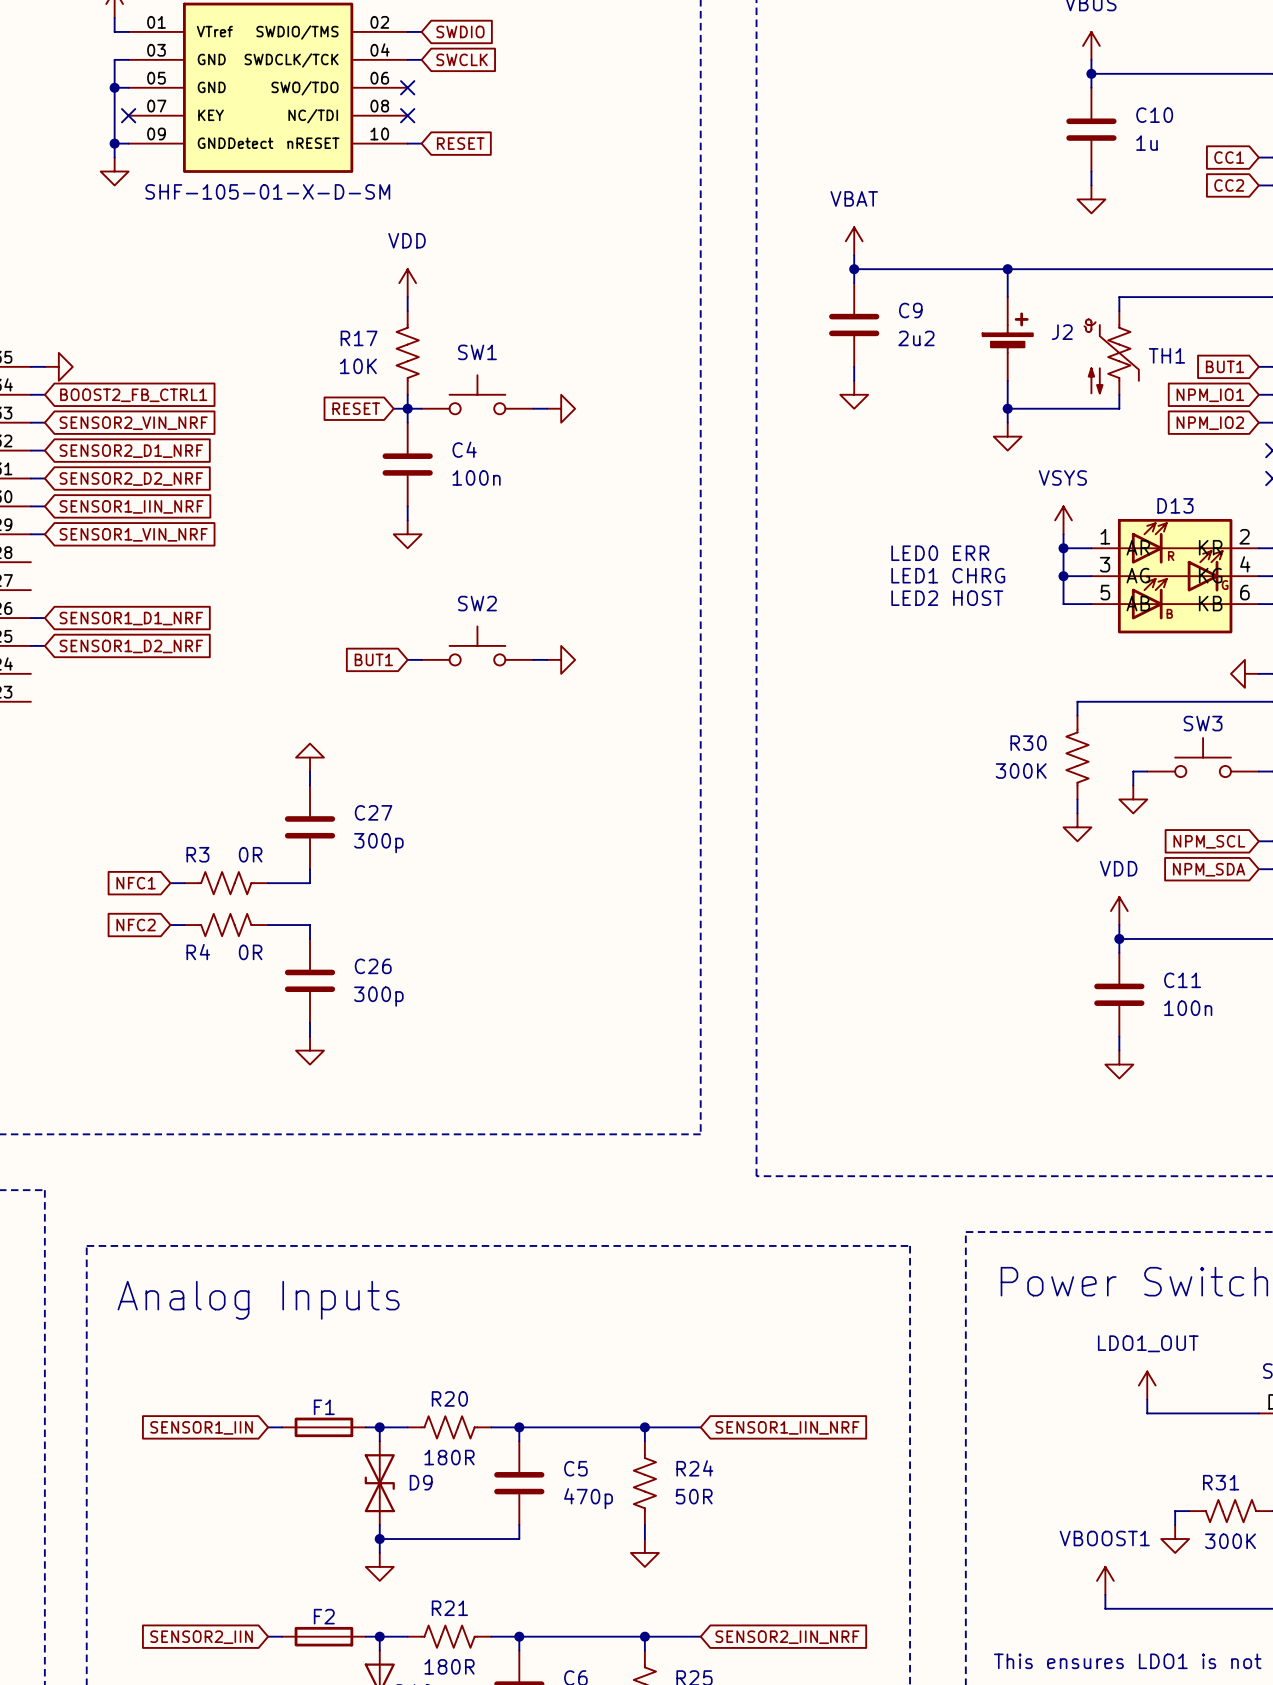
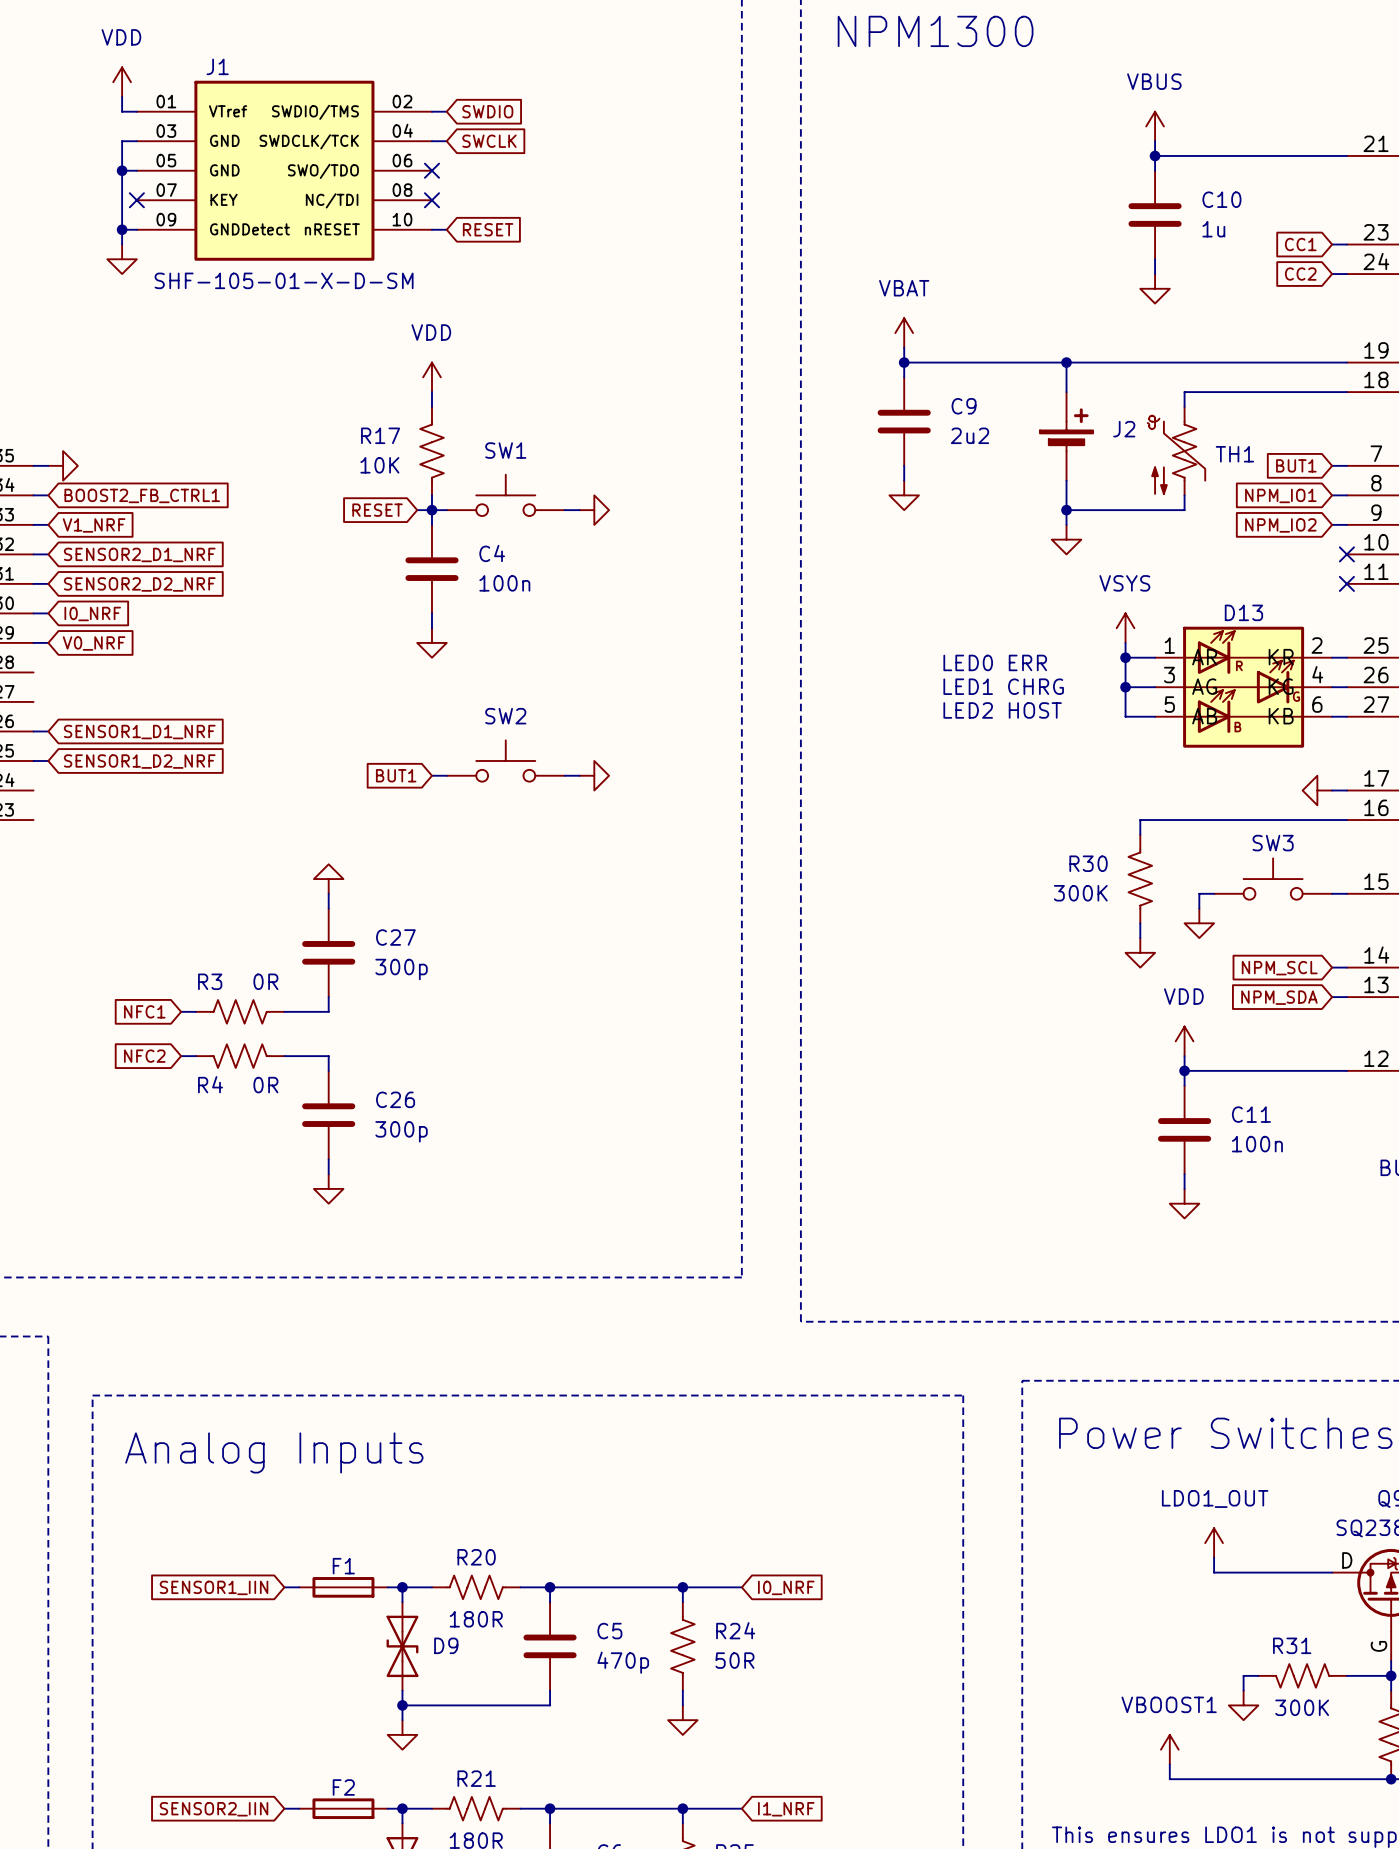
global label: SENSOR2_VIN_NRF (133, 423) -> V1_NRF (94, 525)
global label: SENSOR1_IIN_NRF (131, 506) -> I0_NRF (92, 613)
global label: SENSOR1_VIN_NRF (133, 534) -> V0_NRF (94, 643)
global label: SENSOR1_IIN_NRF (787, 1427) -> I0_NRF (786, 1587)
global label: SENSOR2_IIN_NRF (787, 1637) -> I1_NRF (786, 1809)

